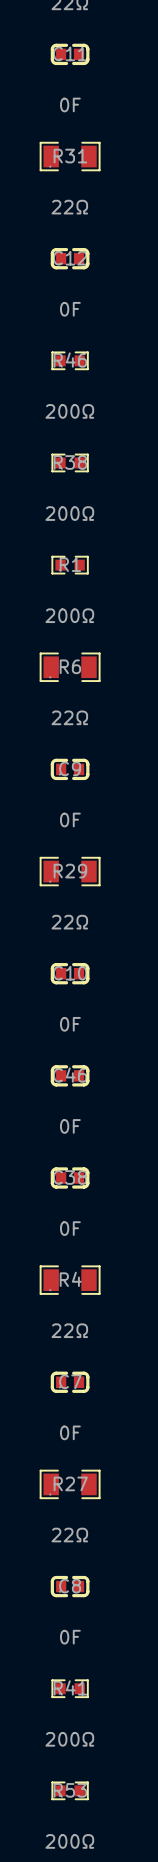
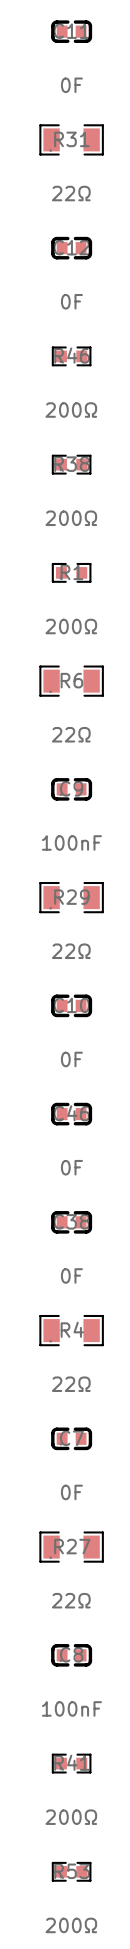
C9 value: 0F (70, 820) -> 100nF (71, 842)
C8 value: 0F (70, 1637) -> 100nF (71, 1708)

